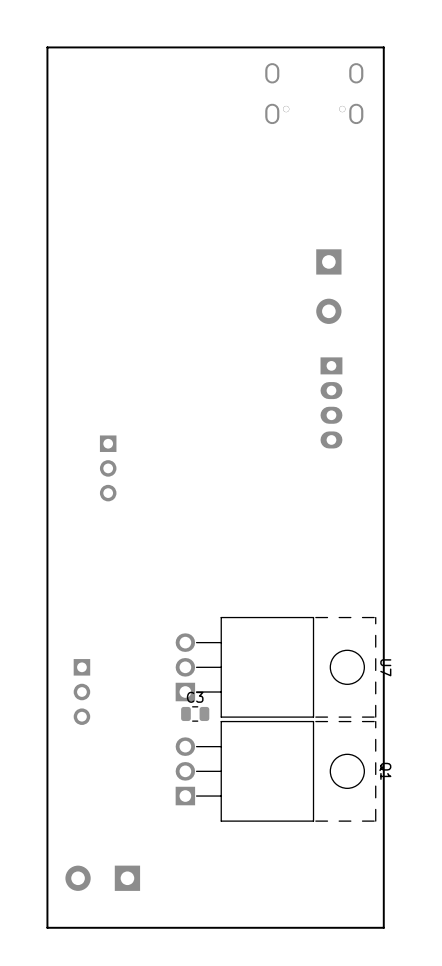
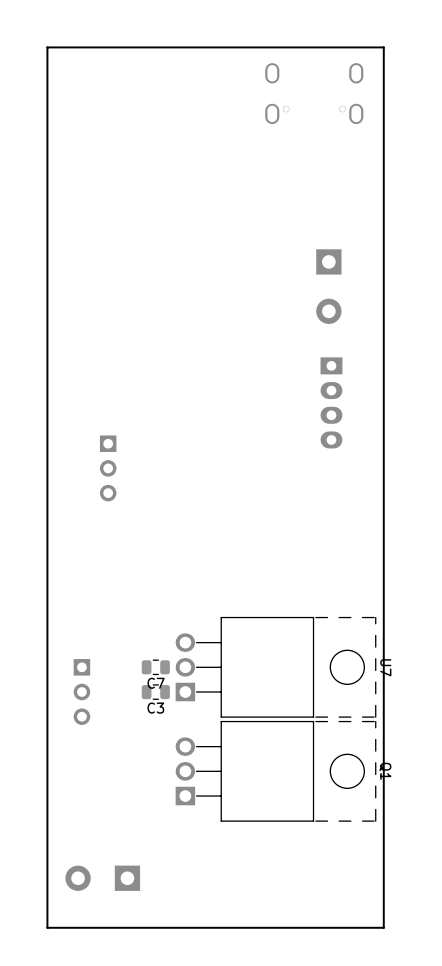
C7: none -> (155, 667)
C3 name position: C3 (195, 697) -> C3 (155, 708)
C3 position: (195, 713) -> (155, 692)

